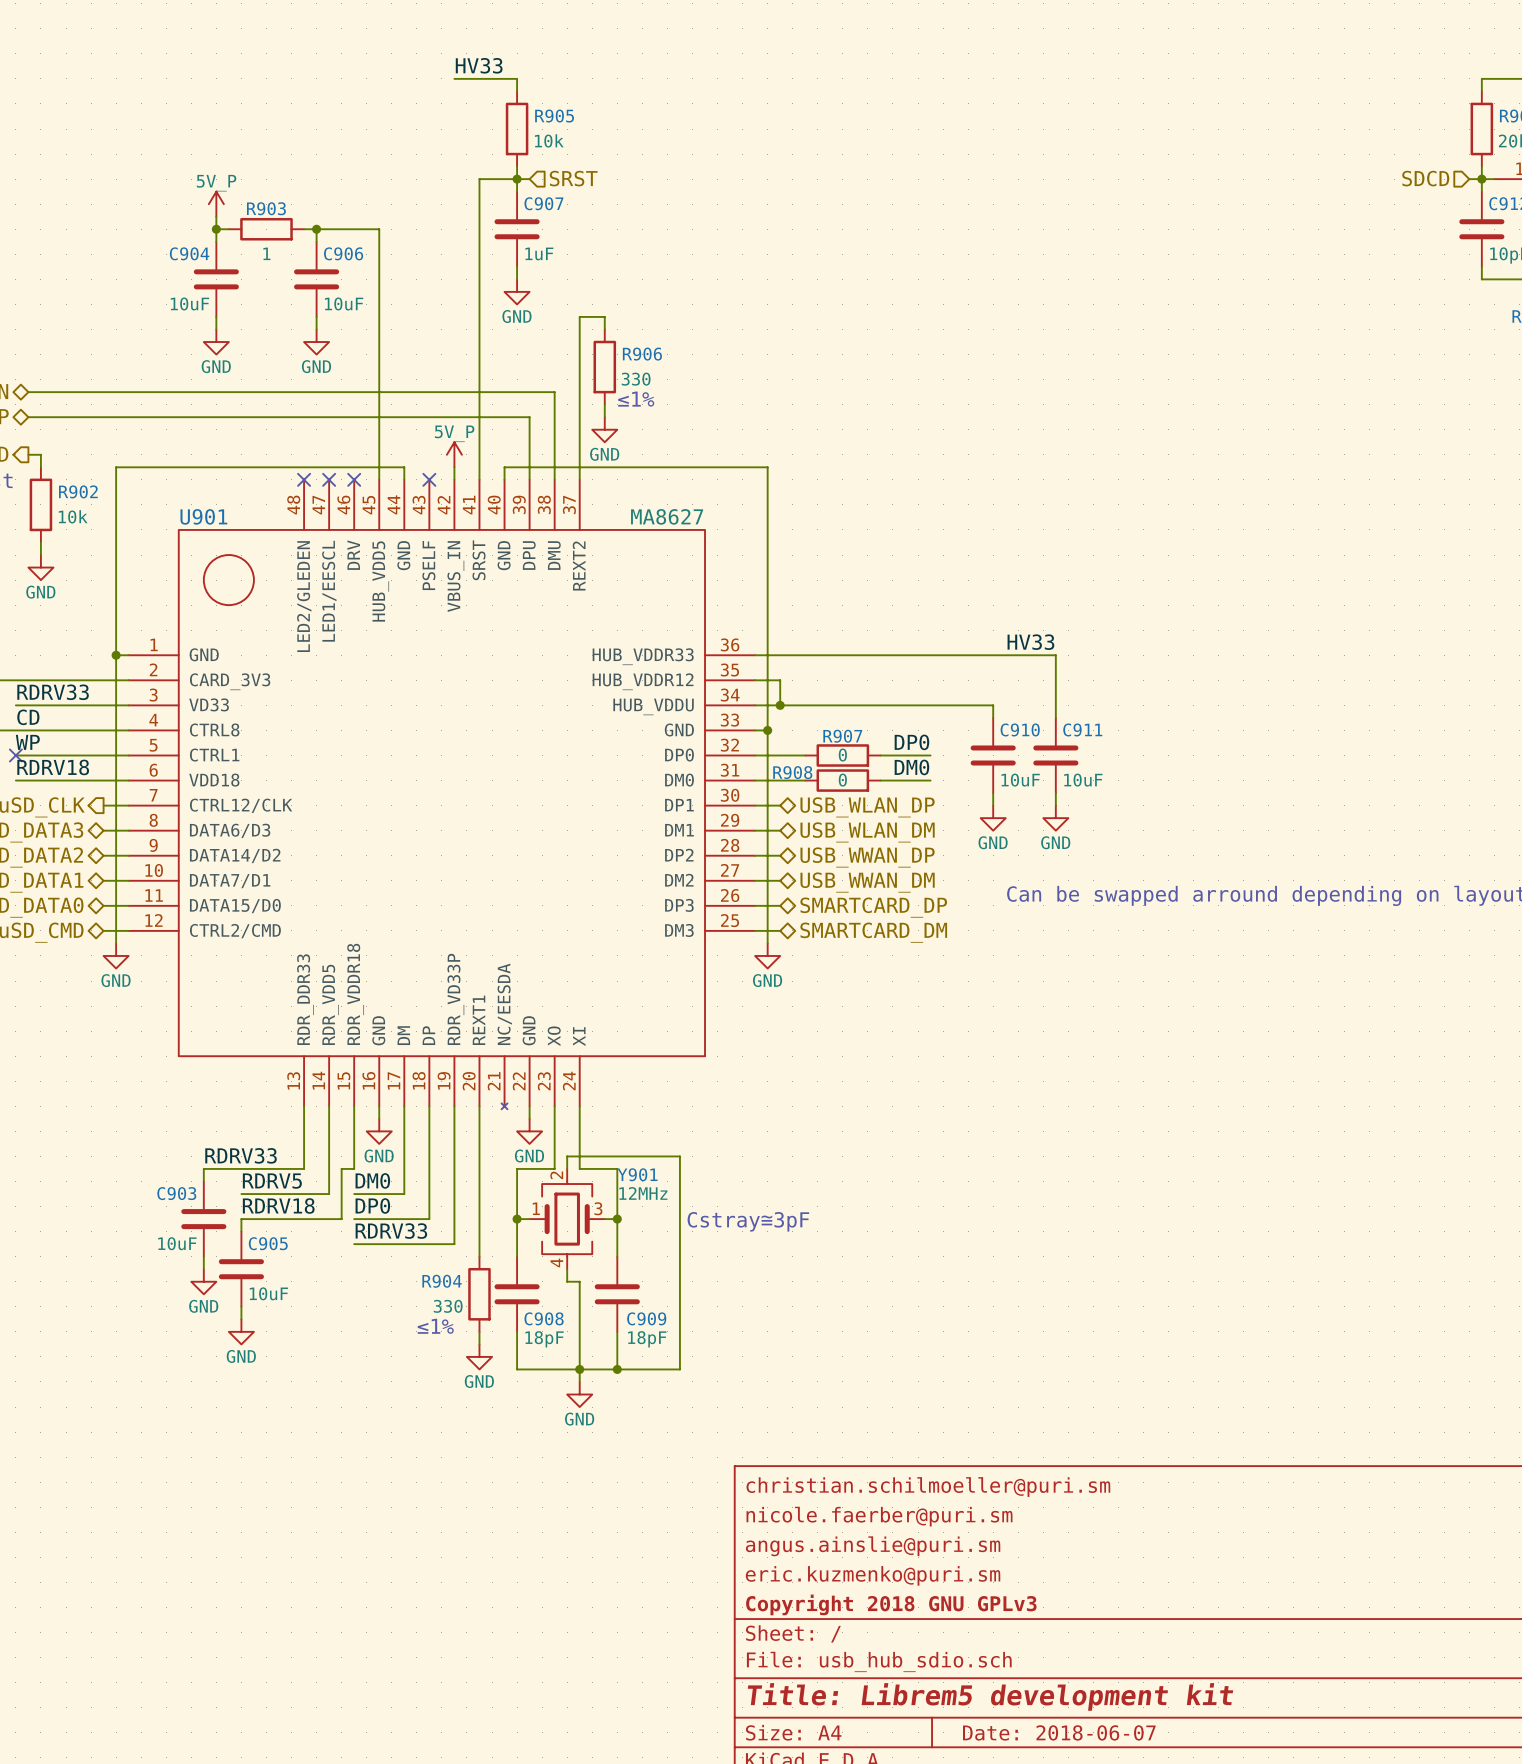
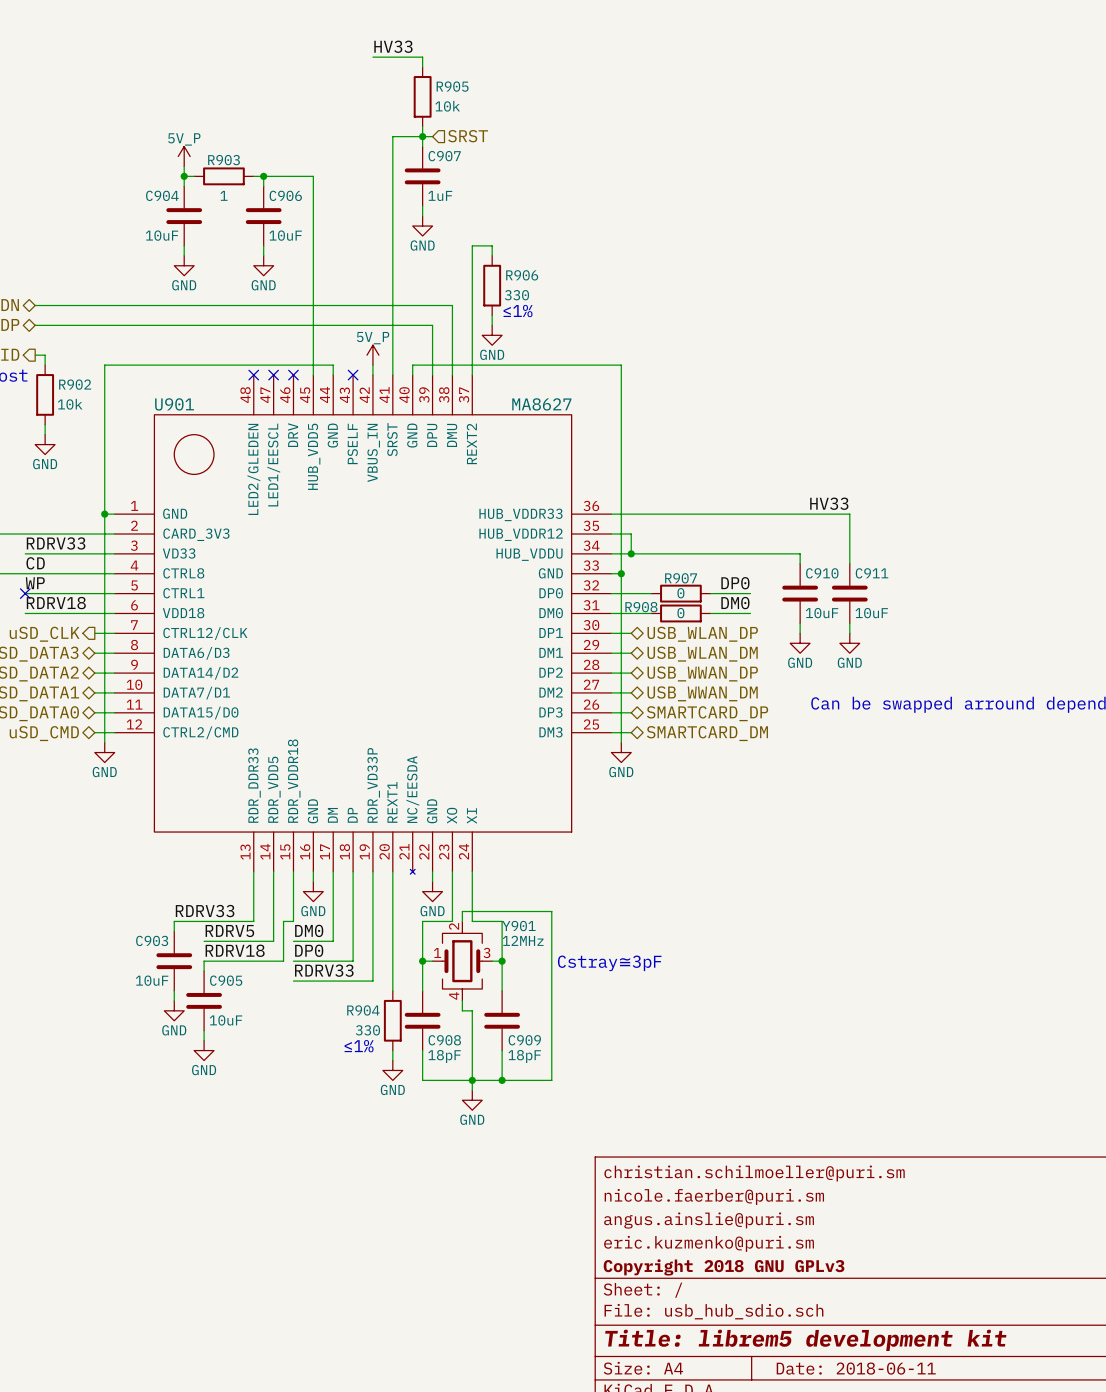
title block: Title: Librem5 development kit (990, 1696) -> Title: librem5 development kit (805, 1340)
title block: Date: 2018-06-07 (1059, 1732) -> Date: 2018-06-11 (856, 1368)

